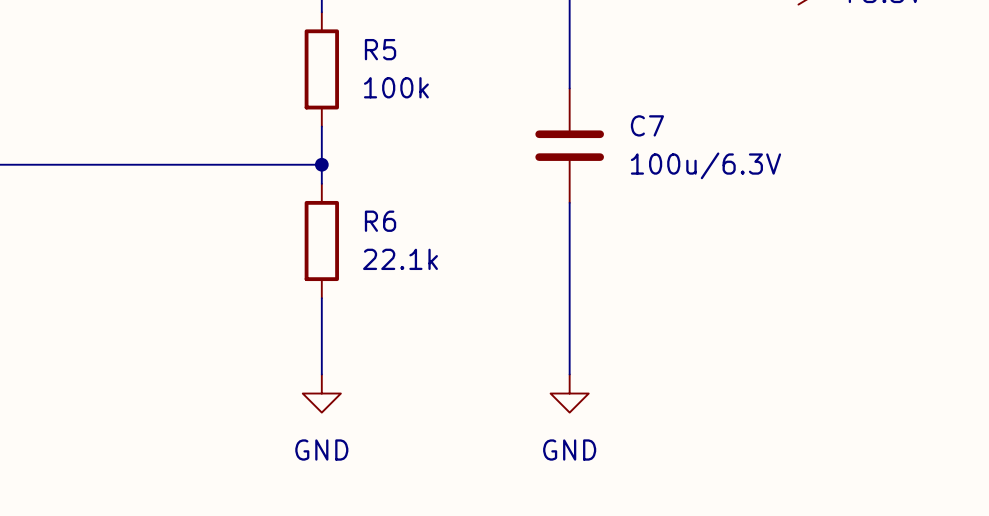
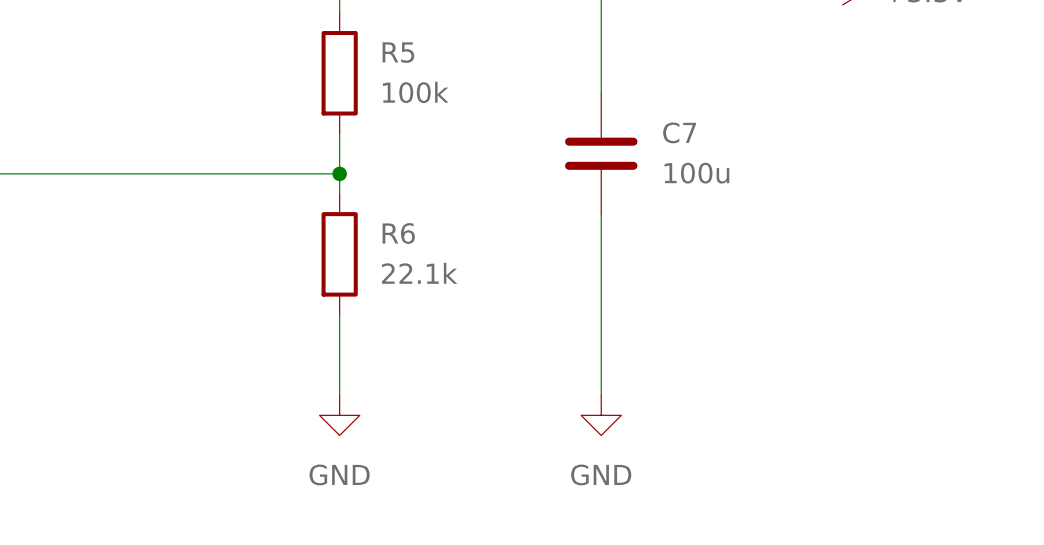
C7 value: 100u/6.3V (705, 165) -> 100u (696, 173)

